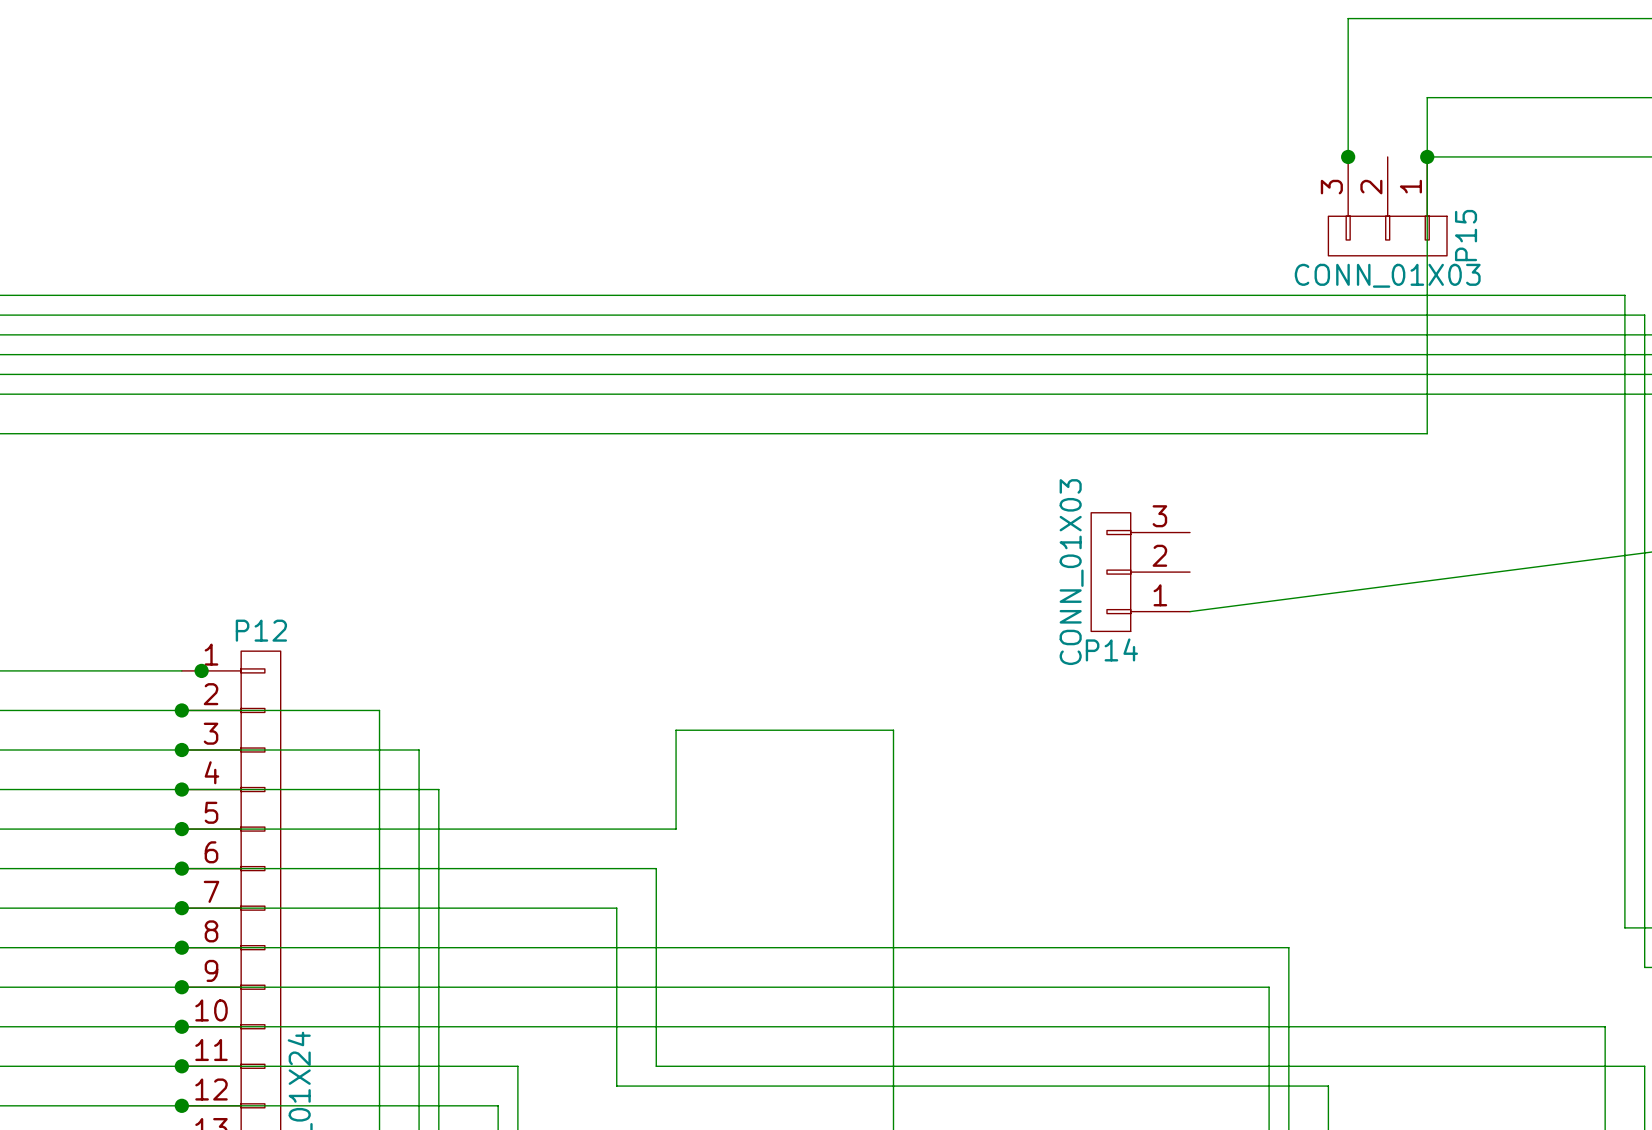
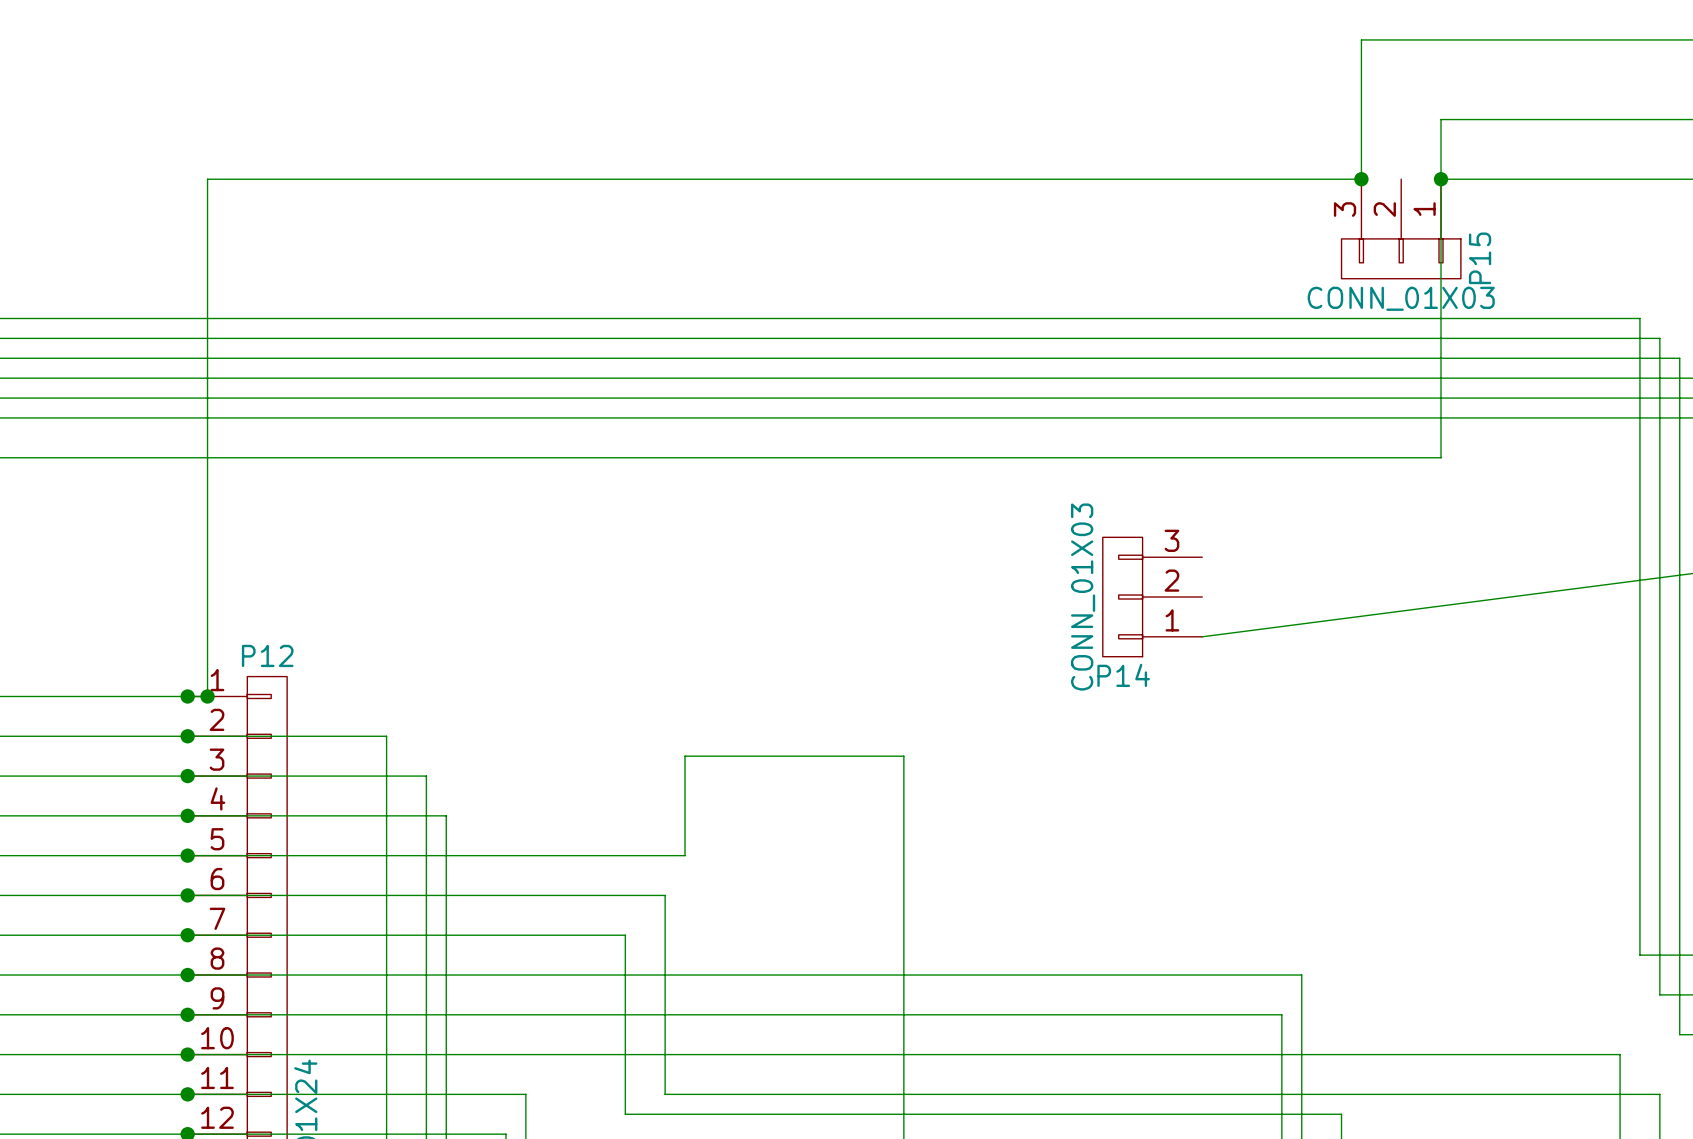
wire: none -> (1361, 179) (207, 179) (207, 696) (187, 696)
junction: none -> (187, 696)

